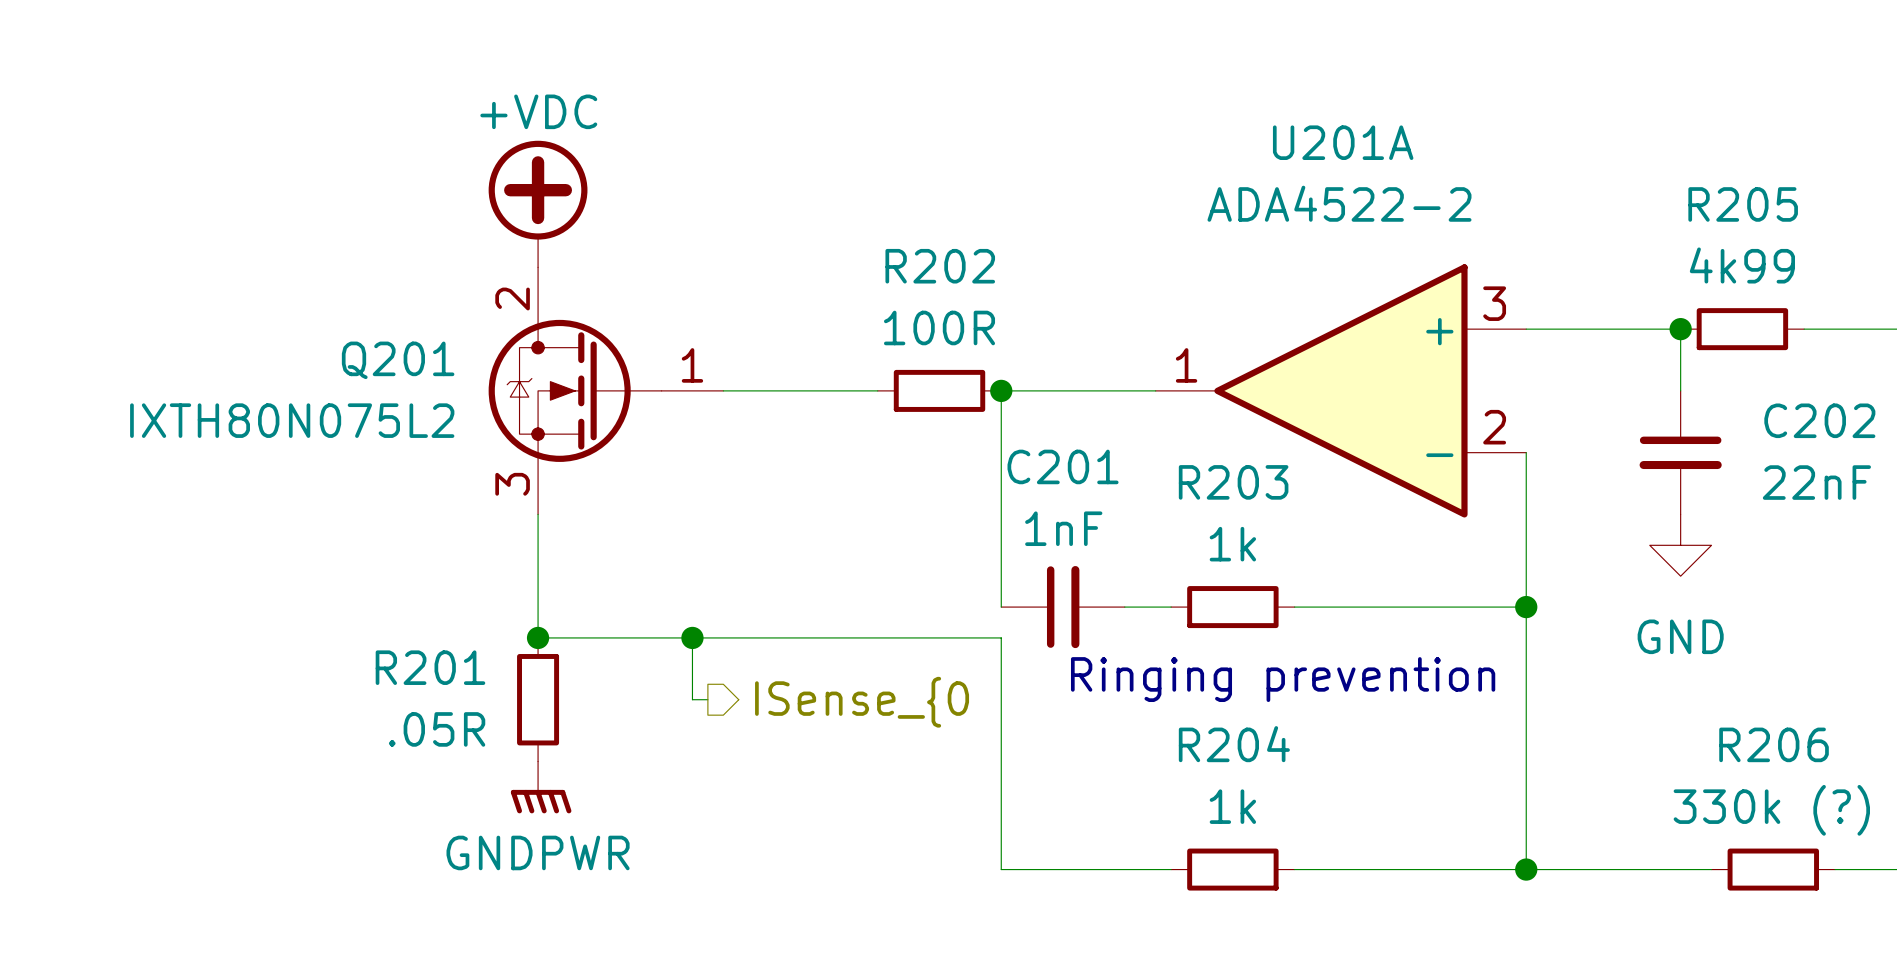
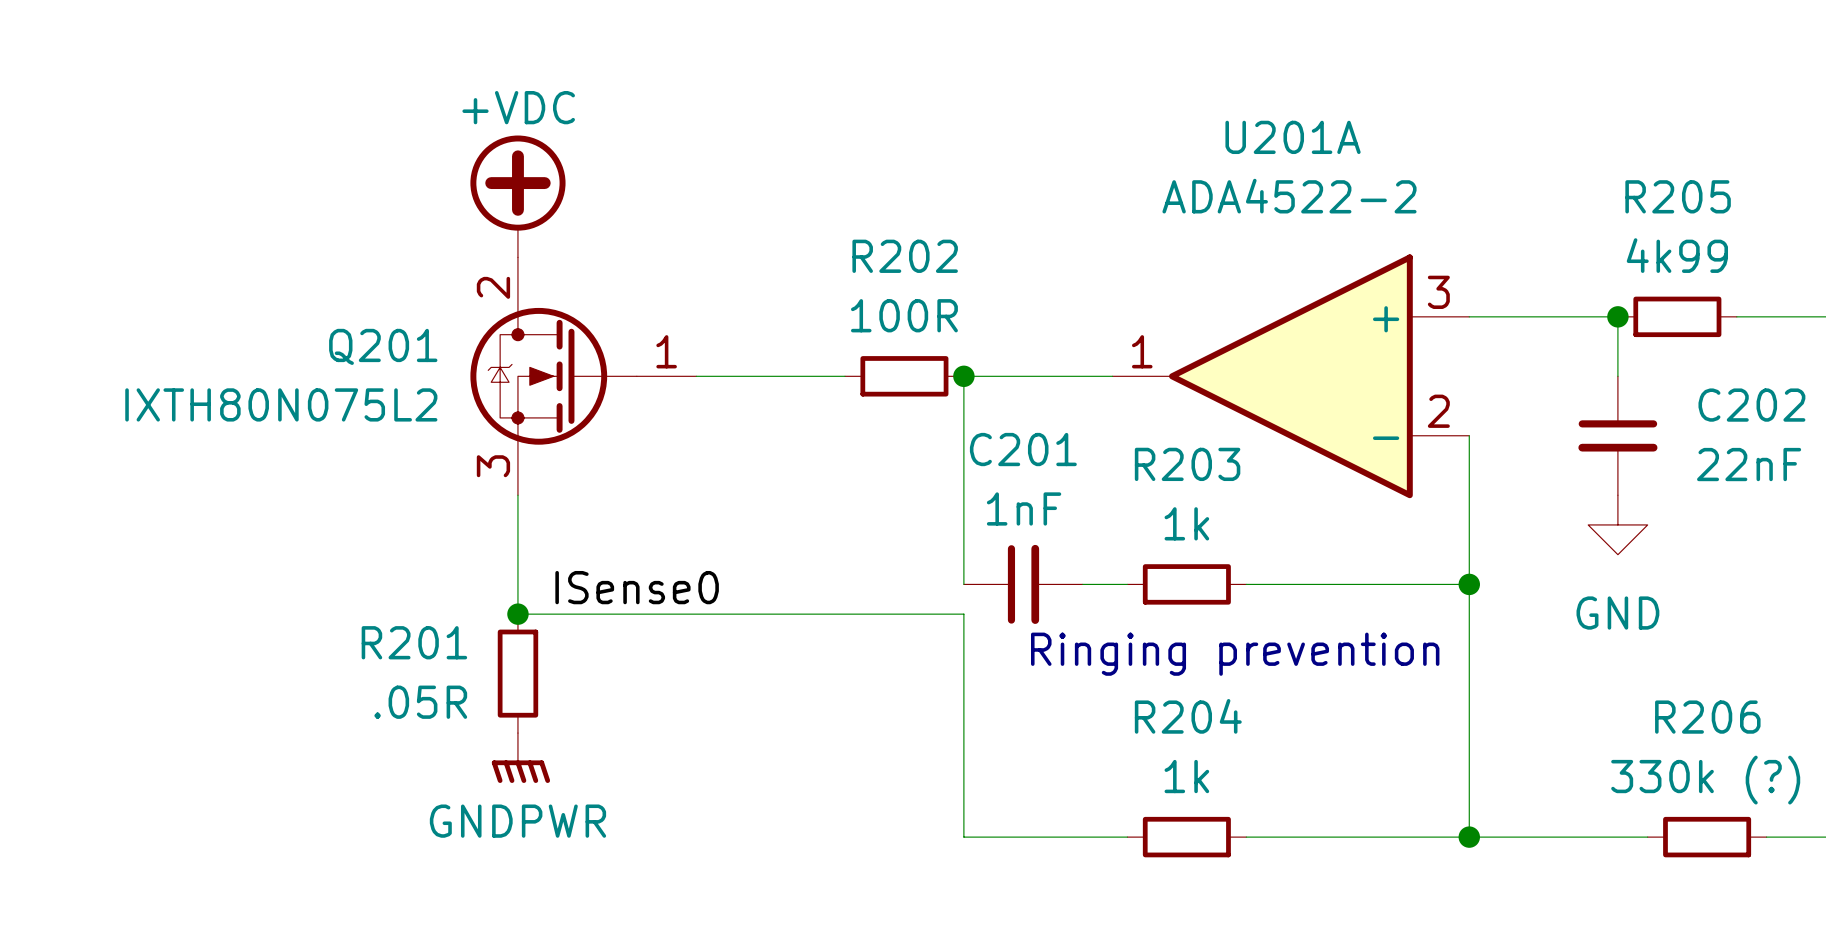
label: none -> ISense0 (637, 587)
wire: (692, 637) (692, 699) (707, 699) -> none
junction: (692, 637) -> none
hierarchical label: ISense_{0 (862, 702) -> none

